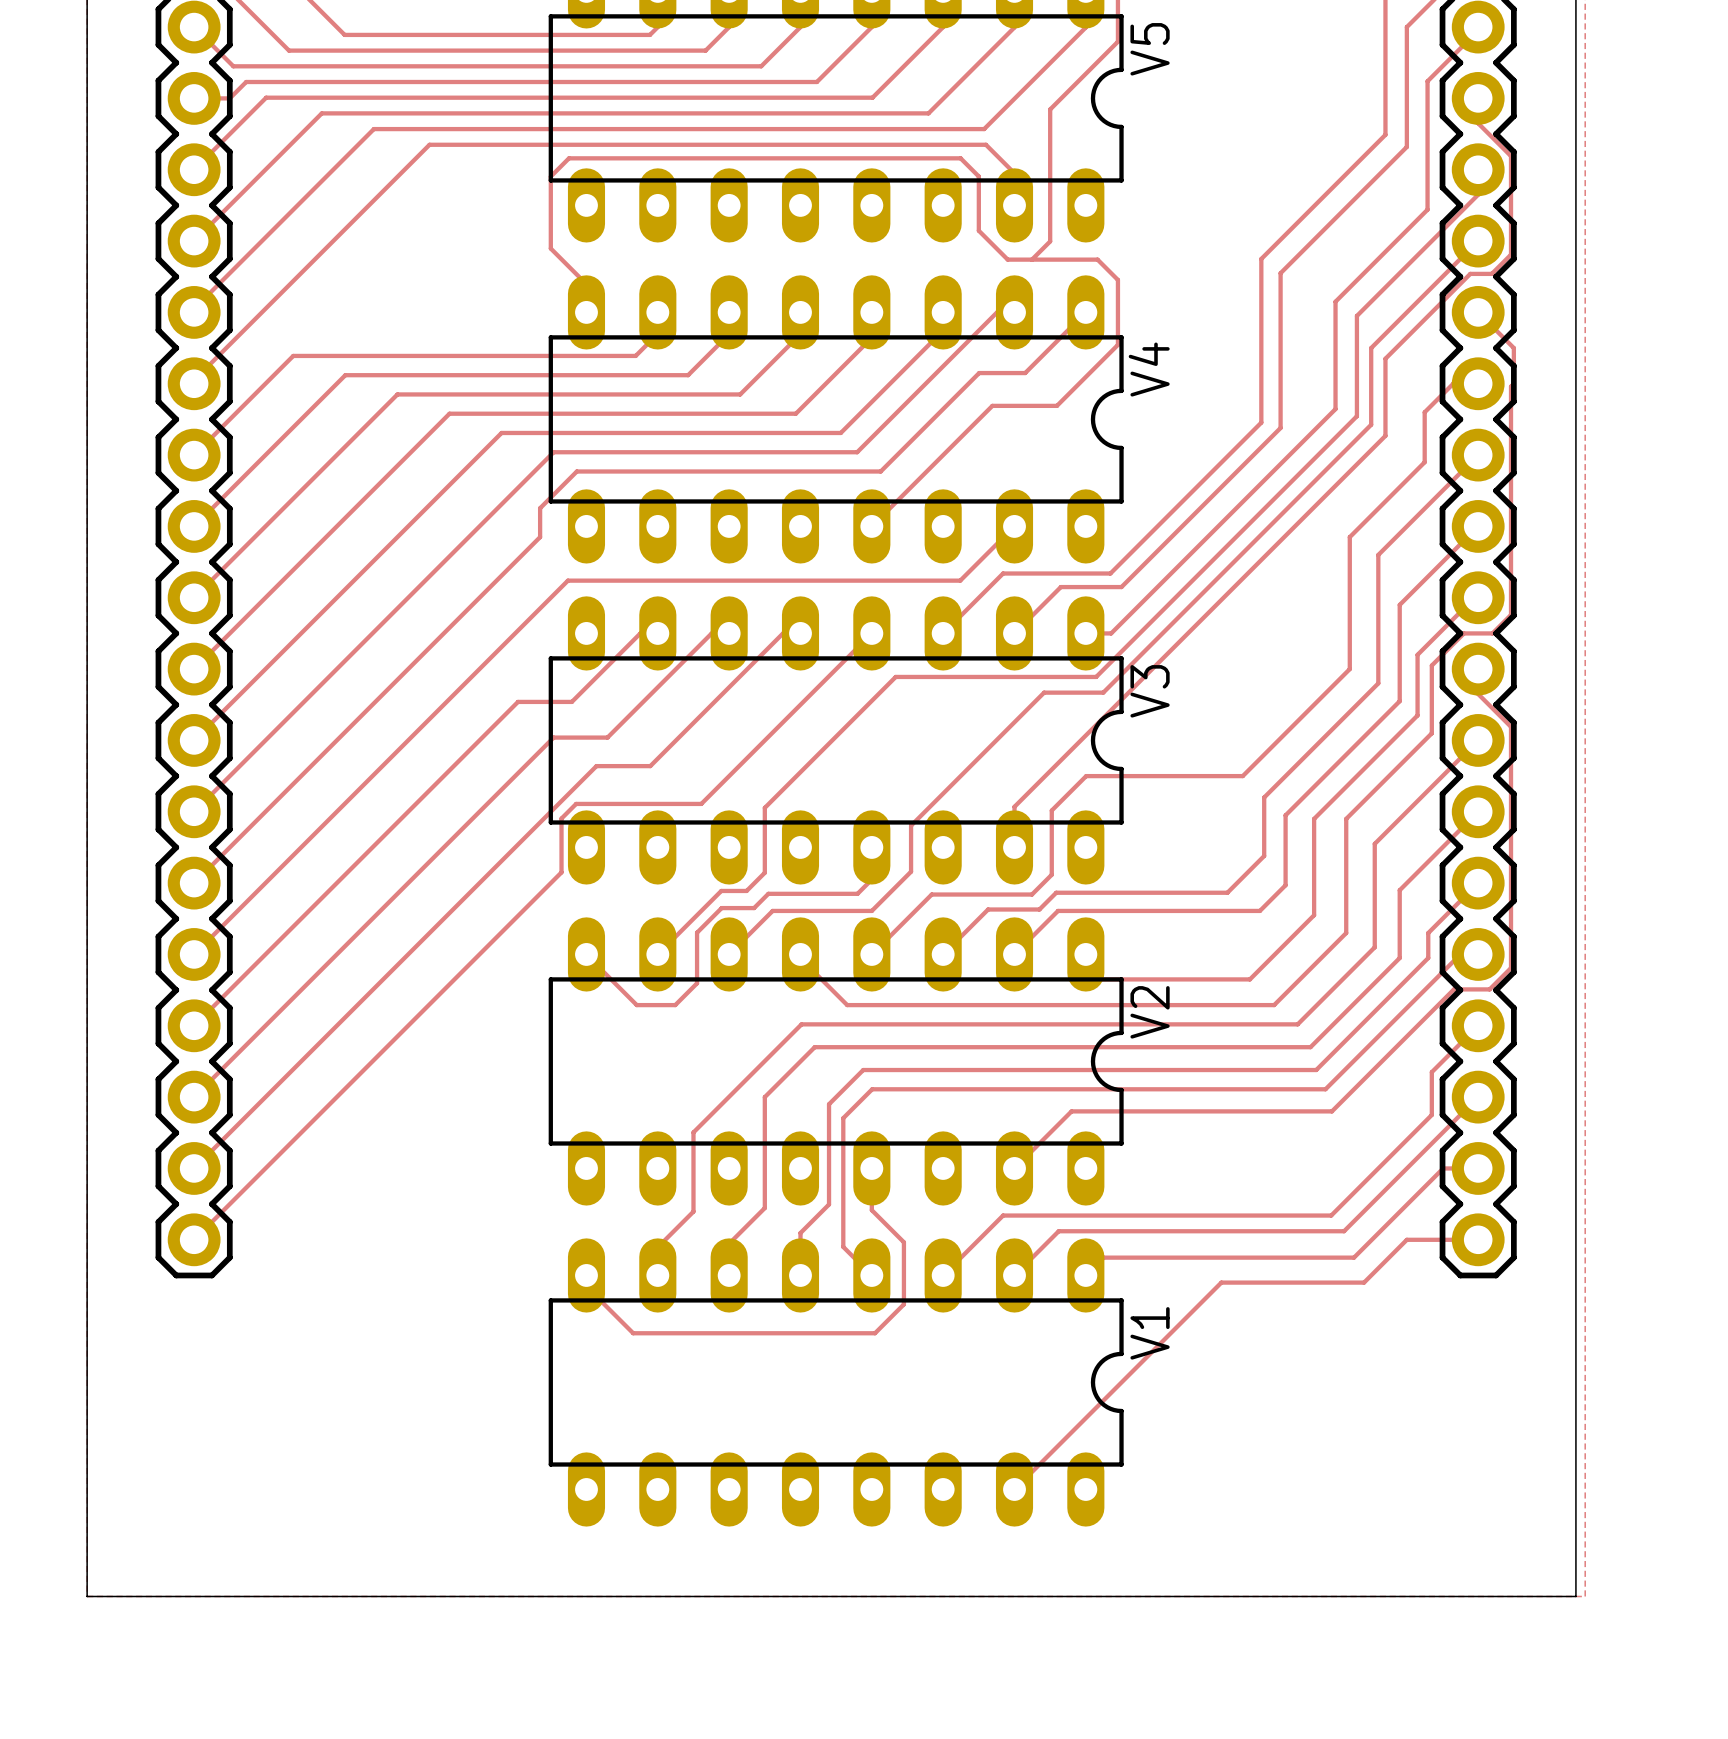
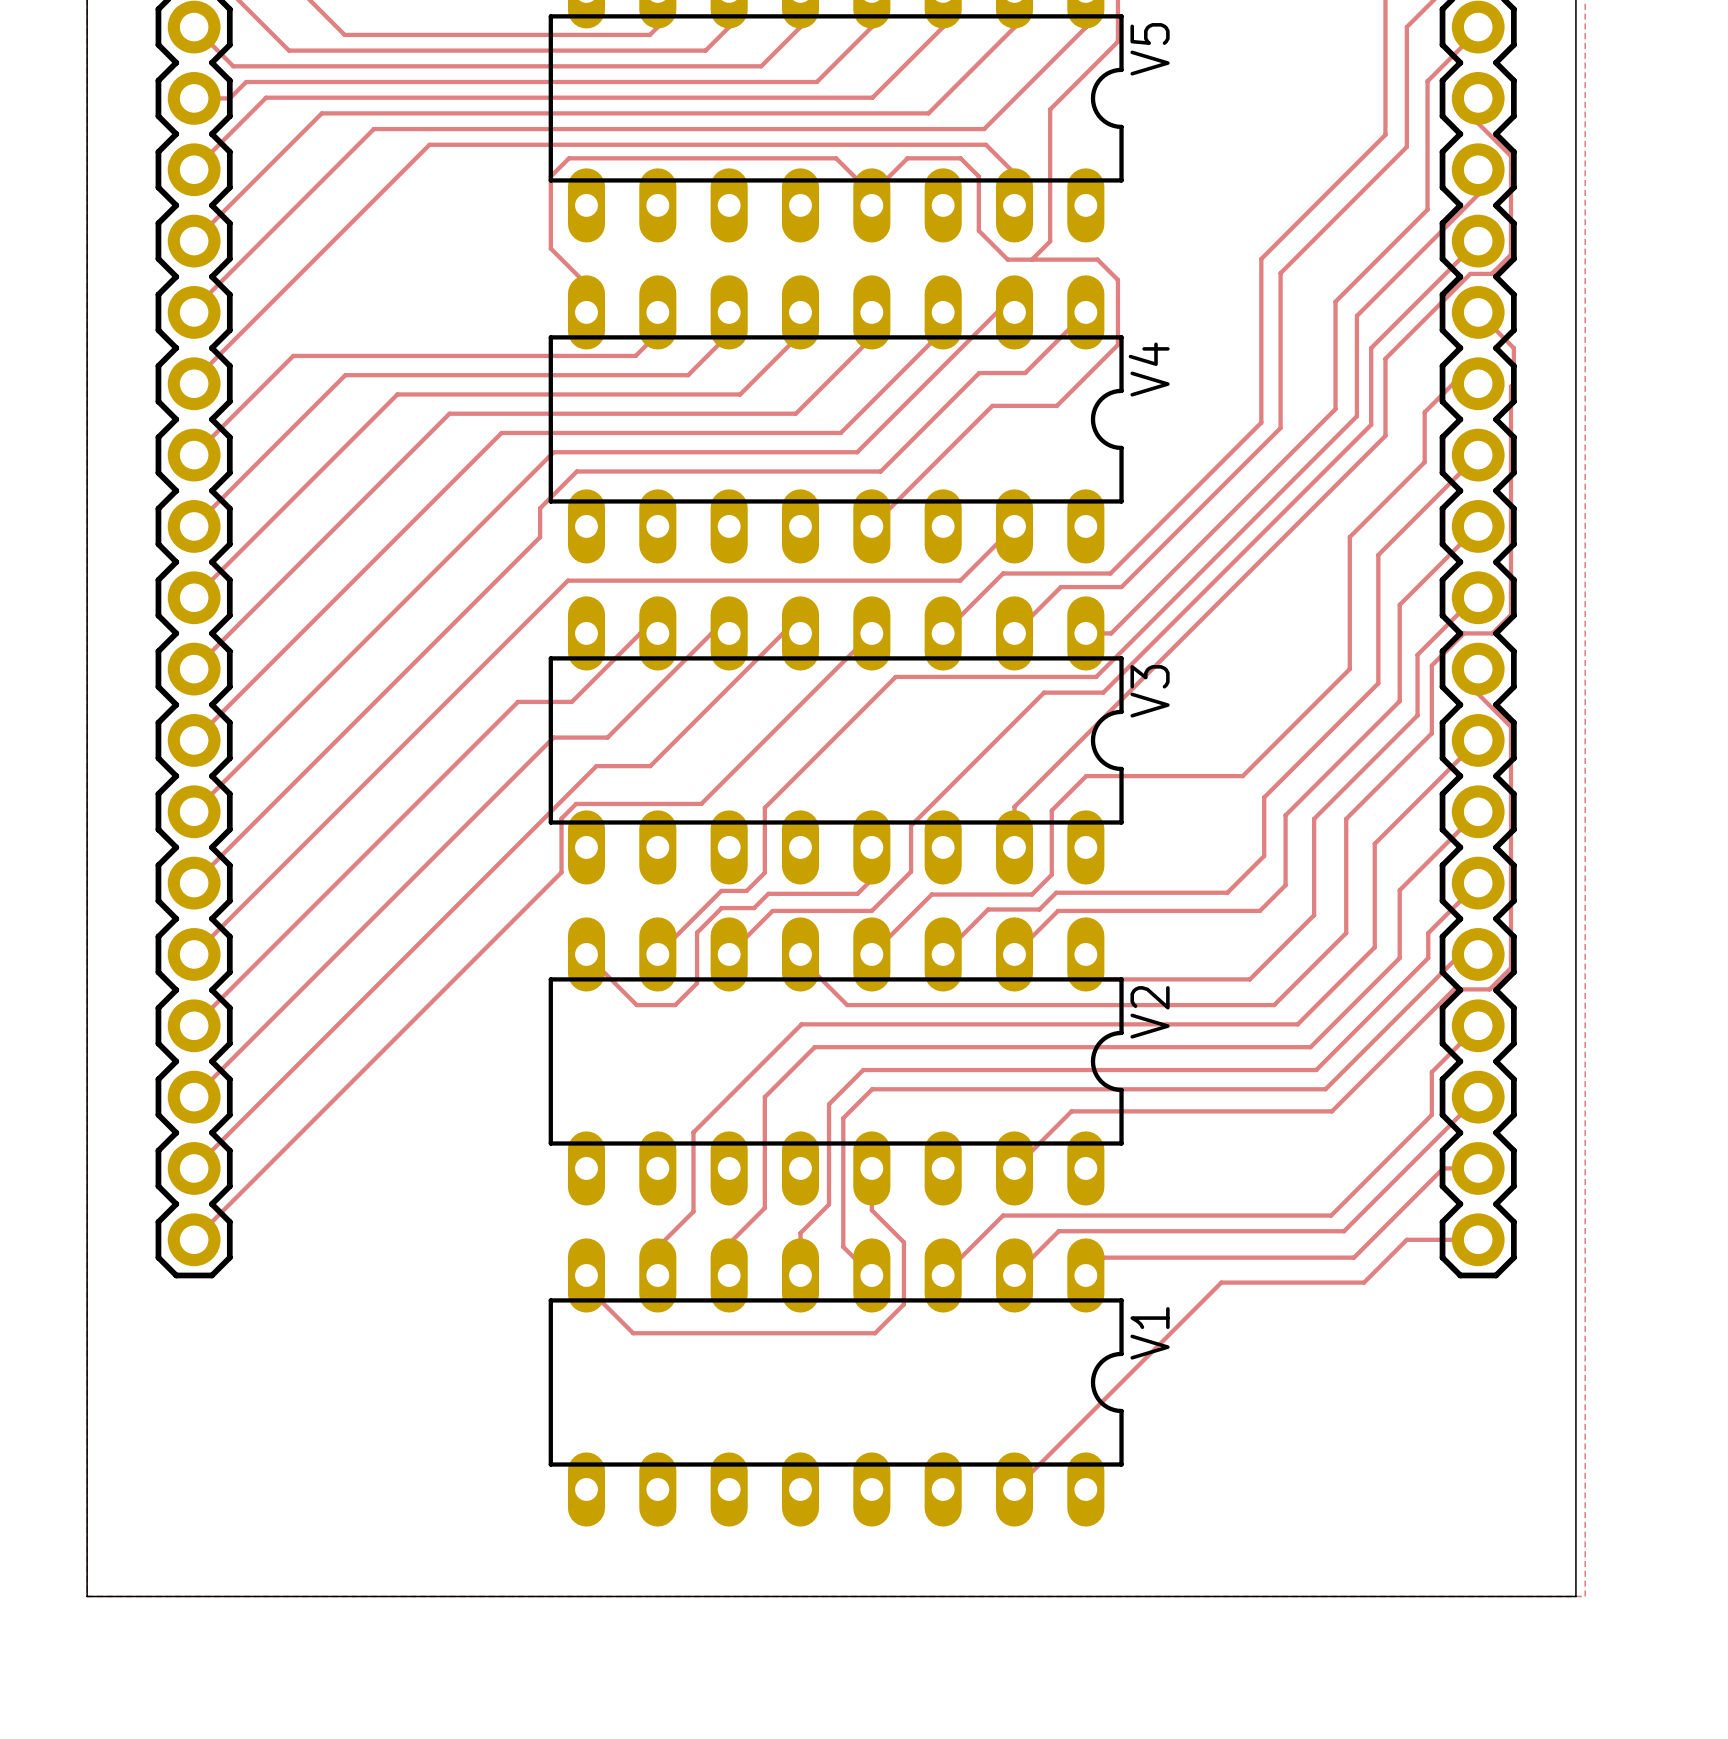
track: (836, 158) (907, 158) -> (836, 158) (871, 194)
track: none -> (907, 158) (871, 194)

